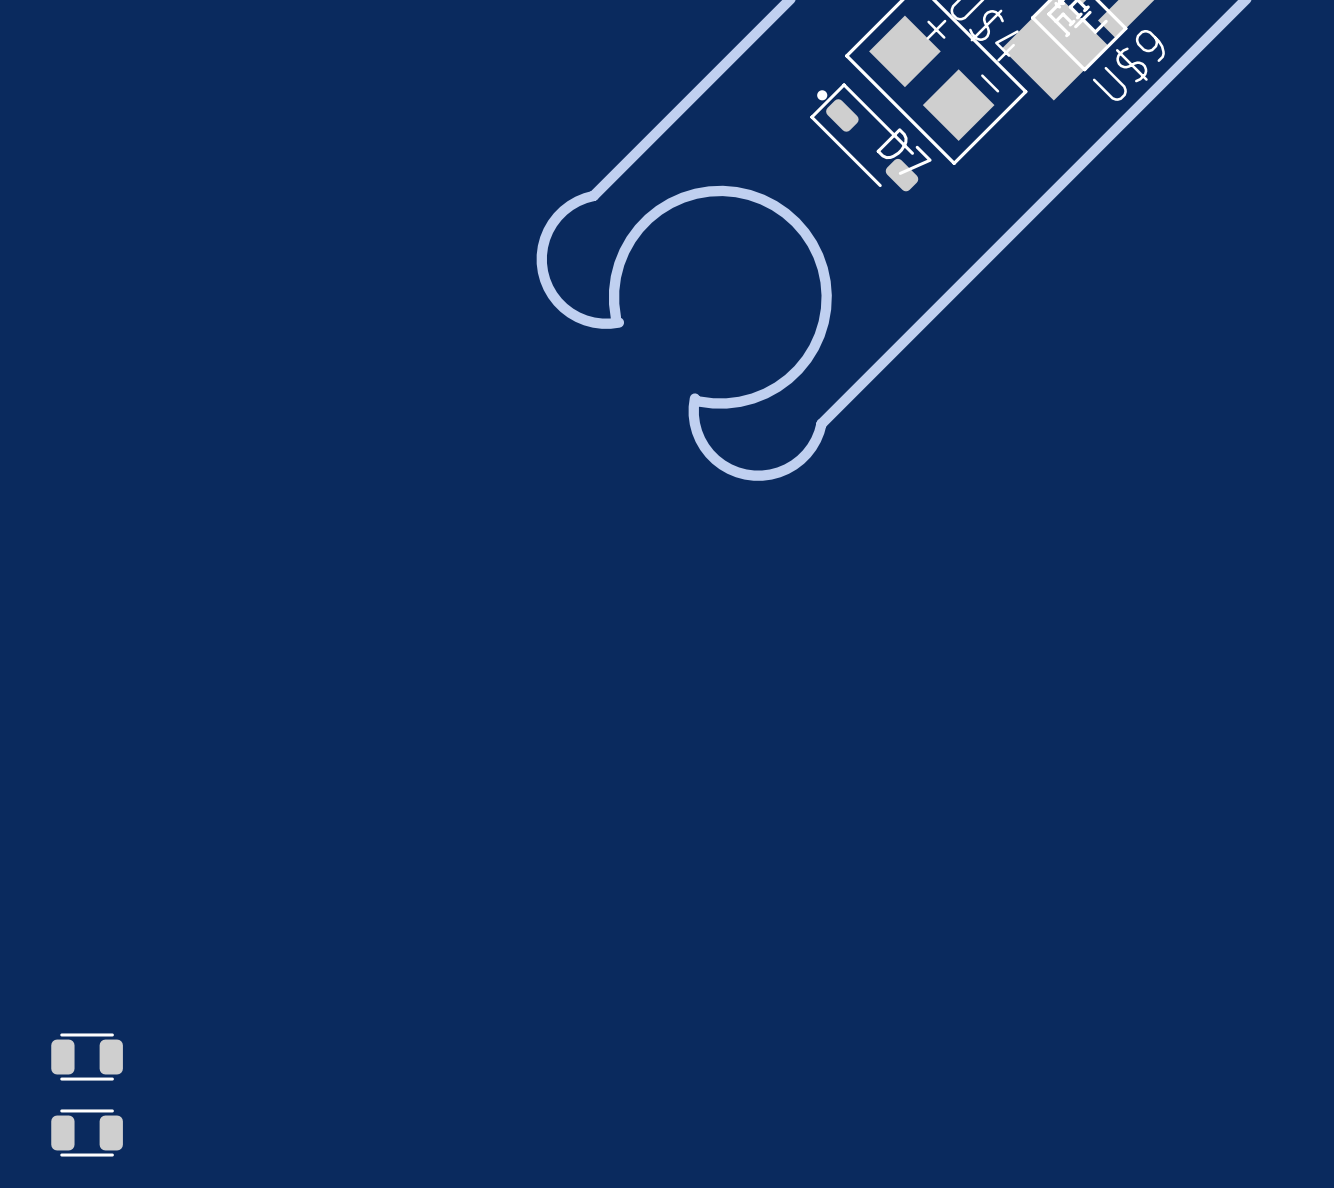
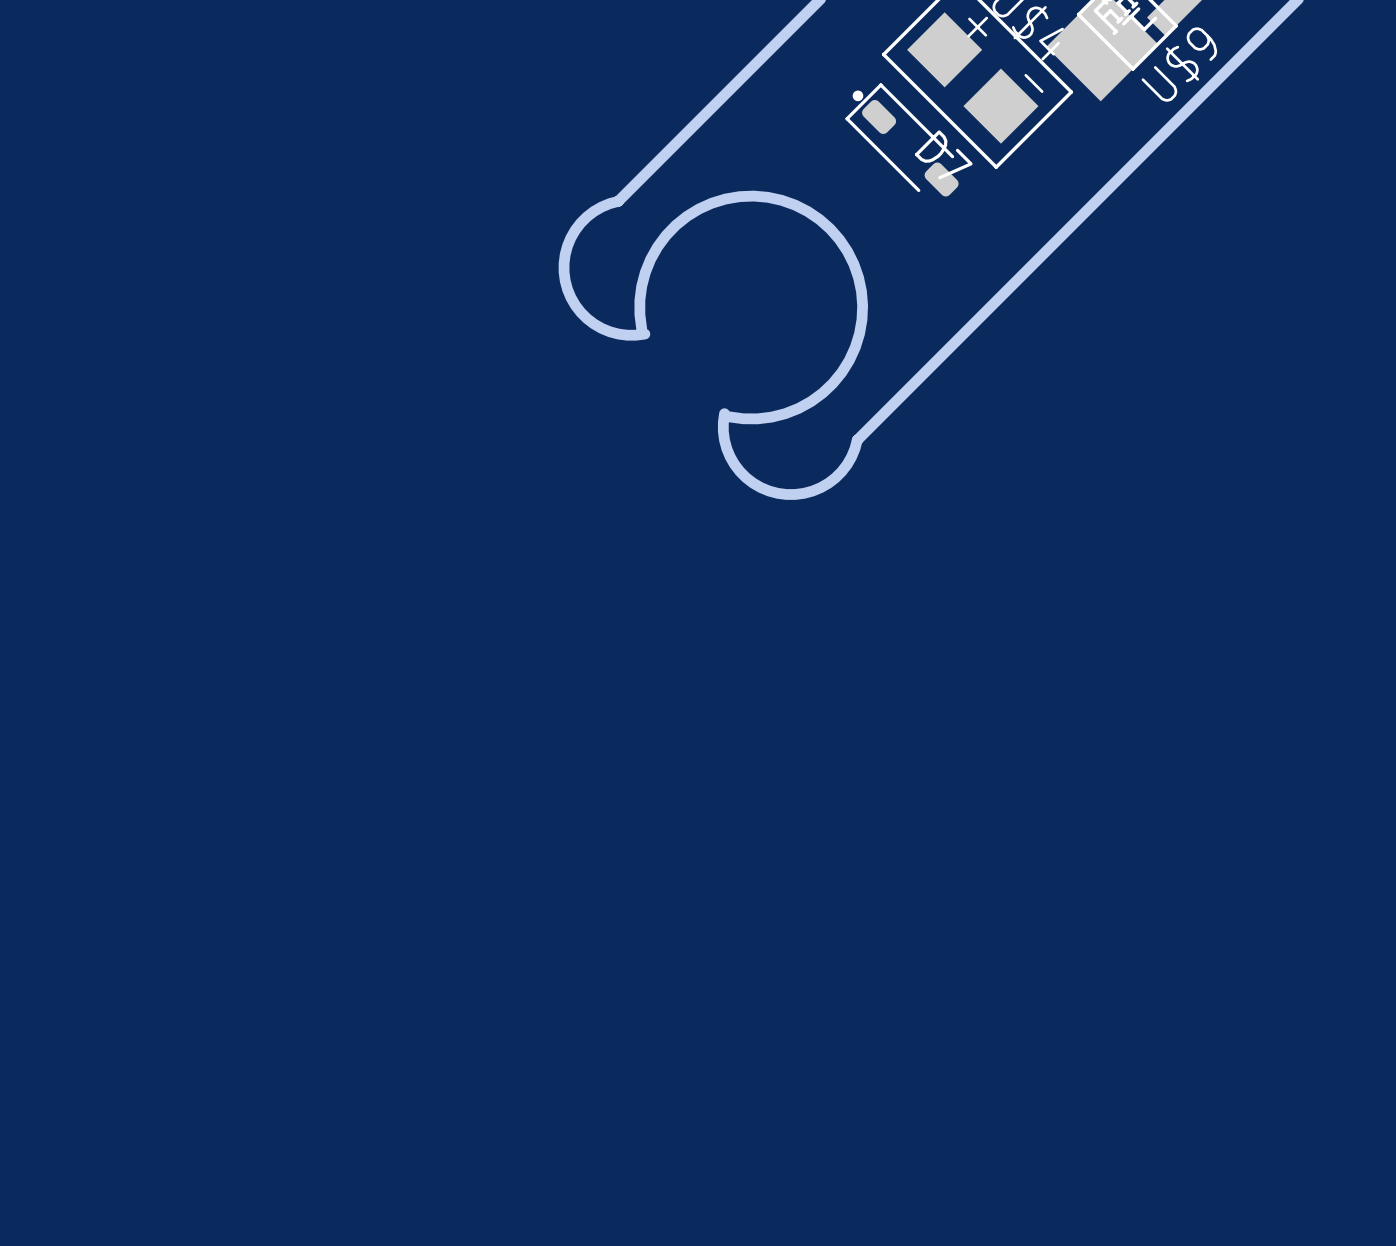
part: (87, 1057) -> none
part: (87, 1132) -> none

